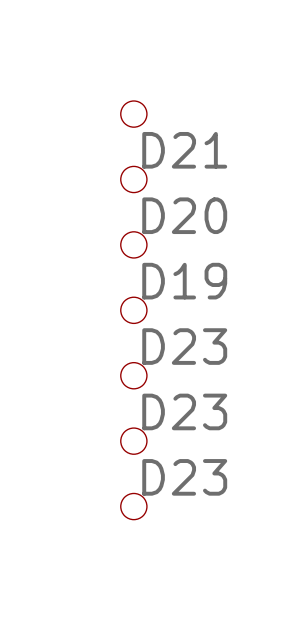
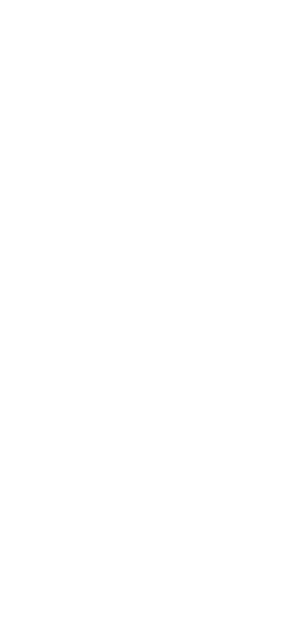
part: (133, 114) -> none
label: D21 (184, 150) -> none
part: (133, 179) -> none
label: D20 (184, 215) -> none
part: (133, 244) -> none
label: D19 (184, 281) -> none
part: (133, 310) -> none
label: D23 (184, 346) -> none
part: (133, 375) -> none
label: D23 (184, 411) -> none
part: (133, 441) -> none
label: D23 (184, 477) -> none
part: (133, 506) -> none

